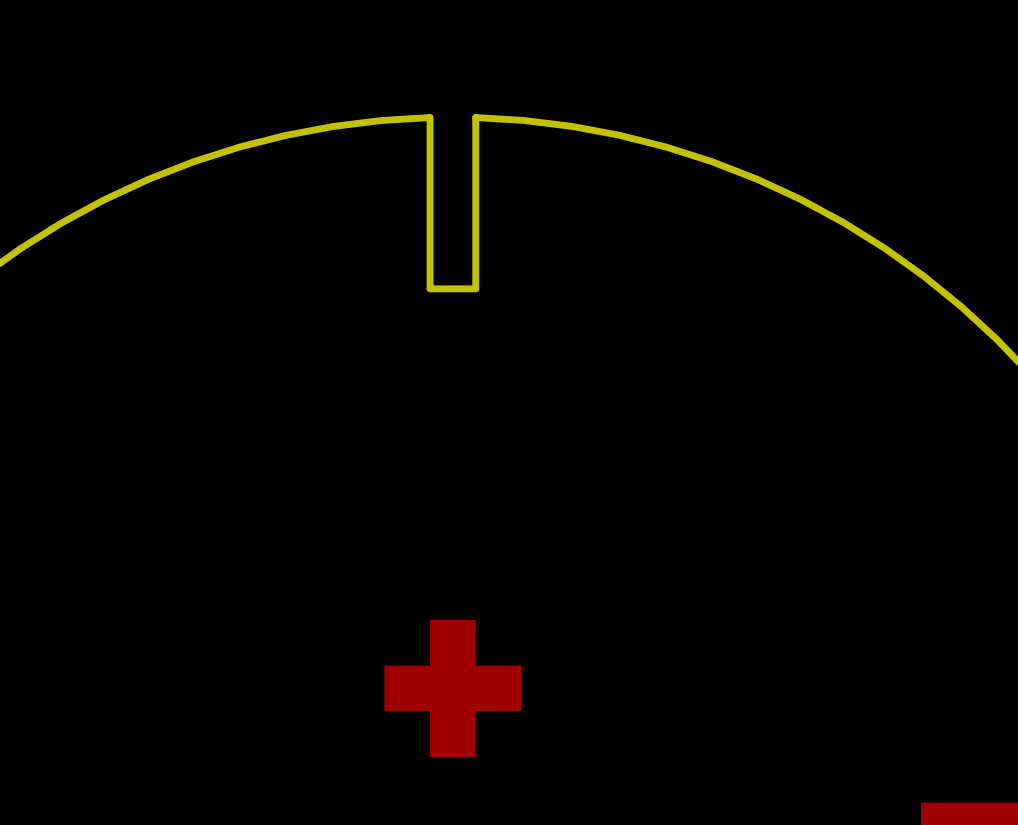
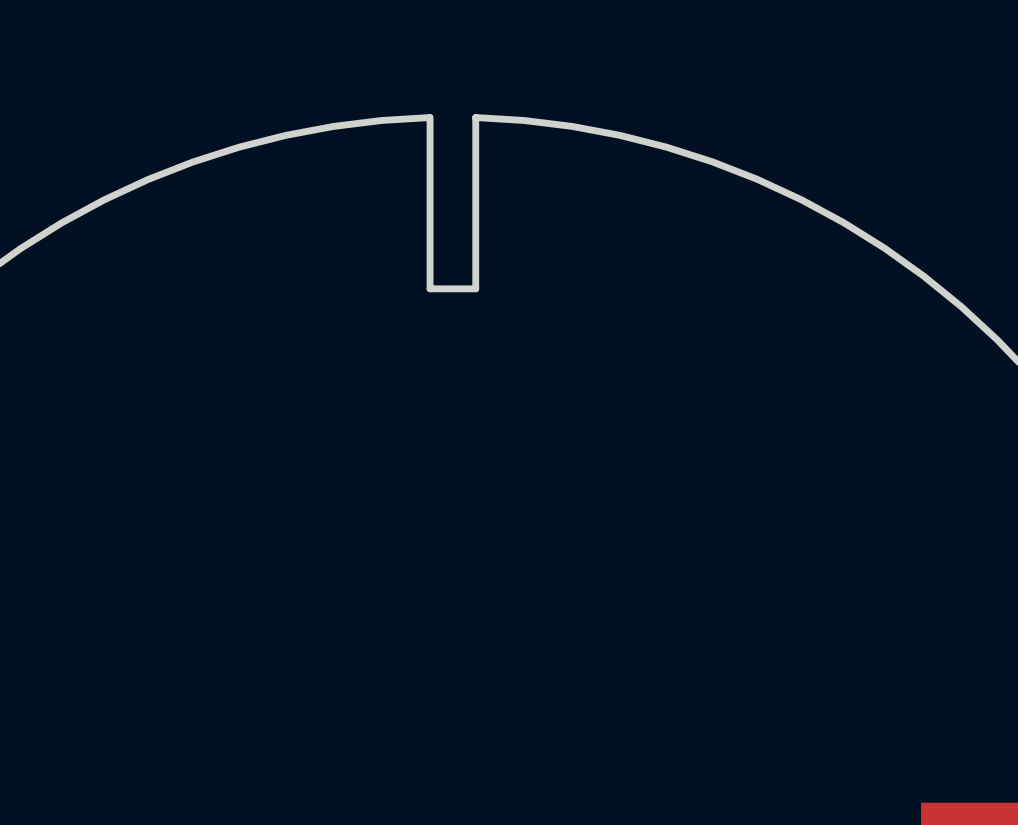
part: (452, 642) -> none
part: (407, 688) -> none
part: (452, 688) -> none
part: (498, 688) -> none
part: (452, 734) -> none

